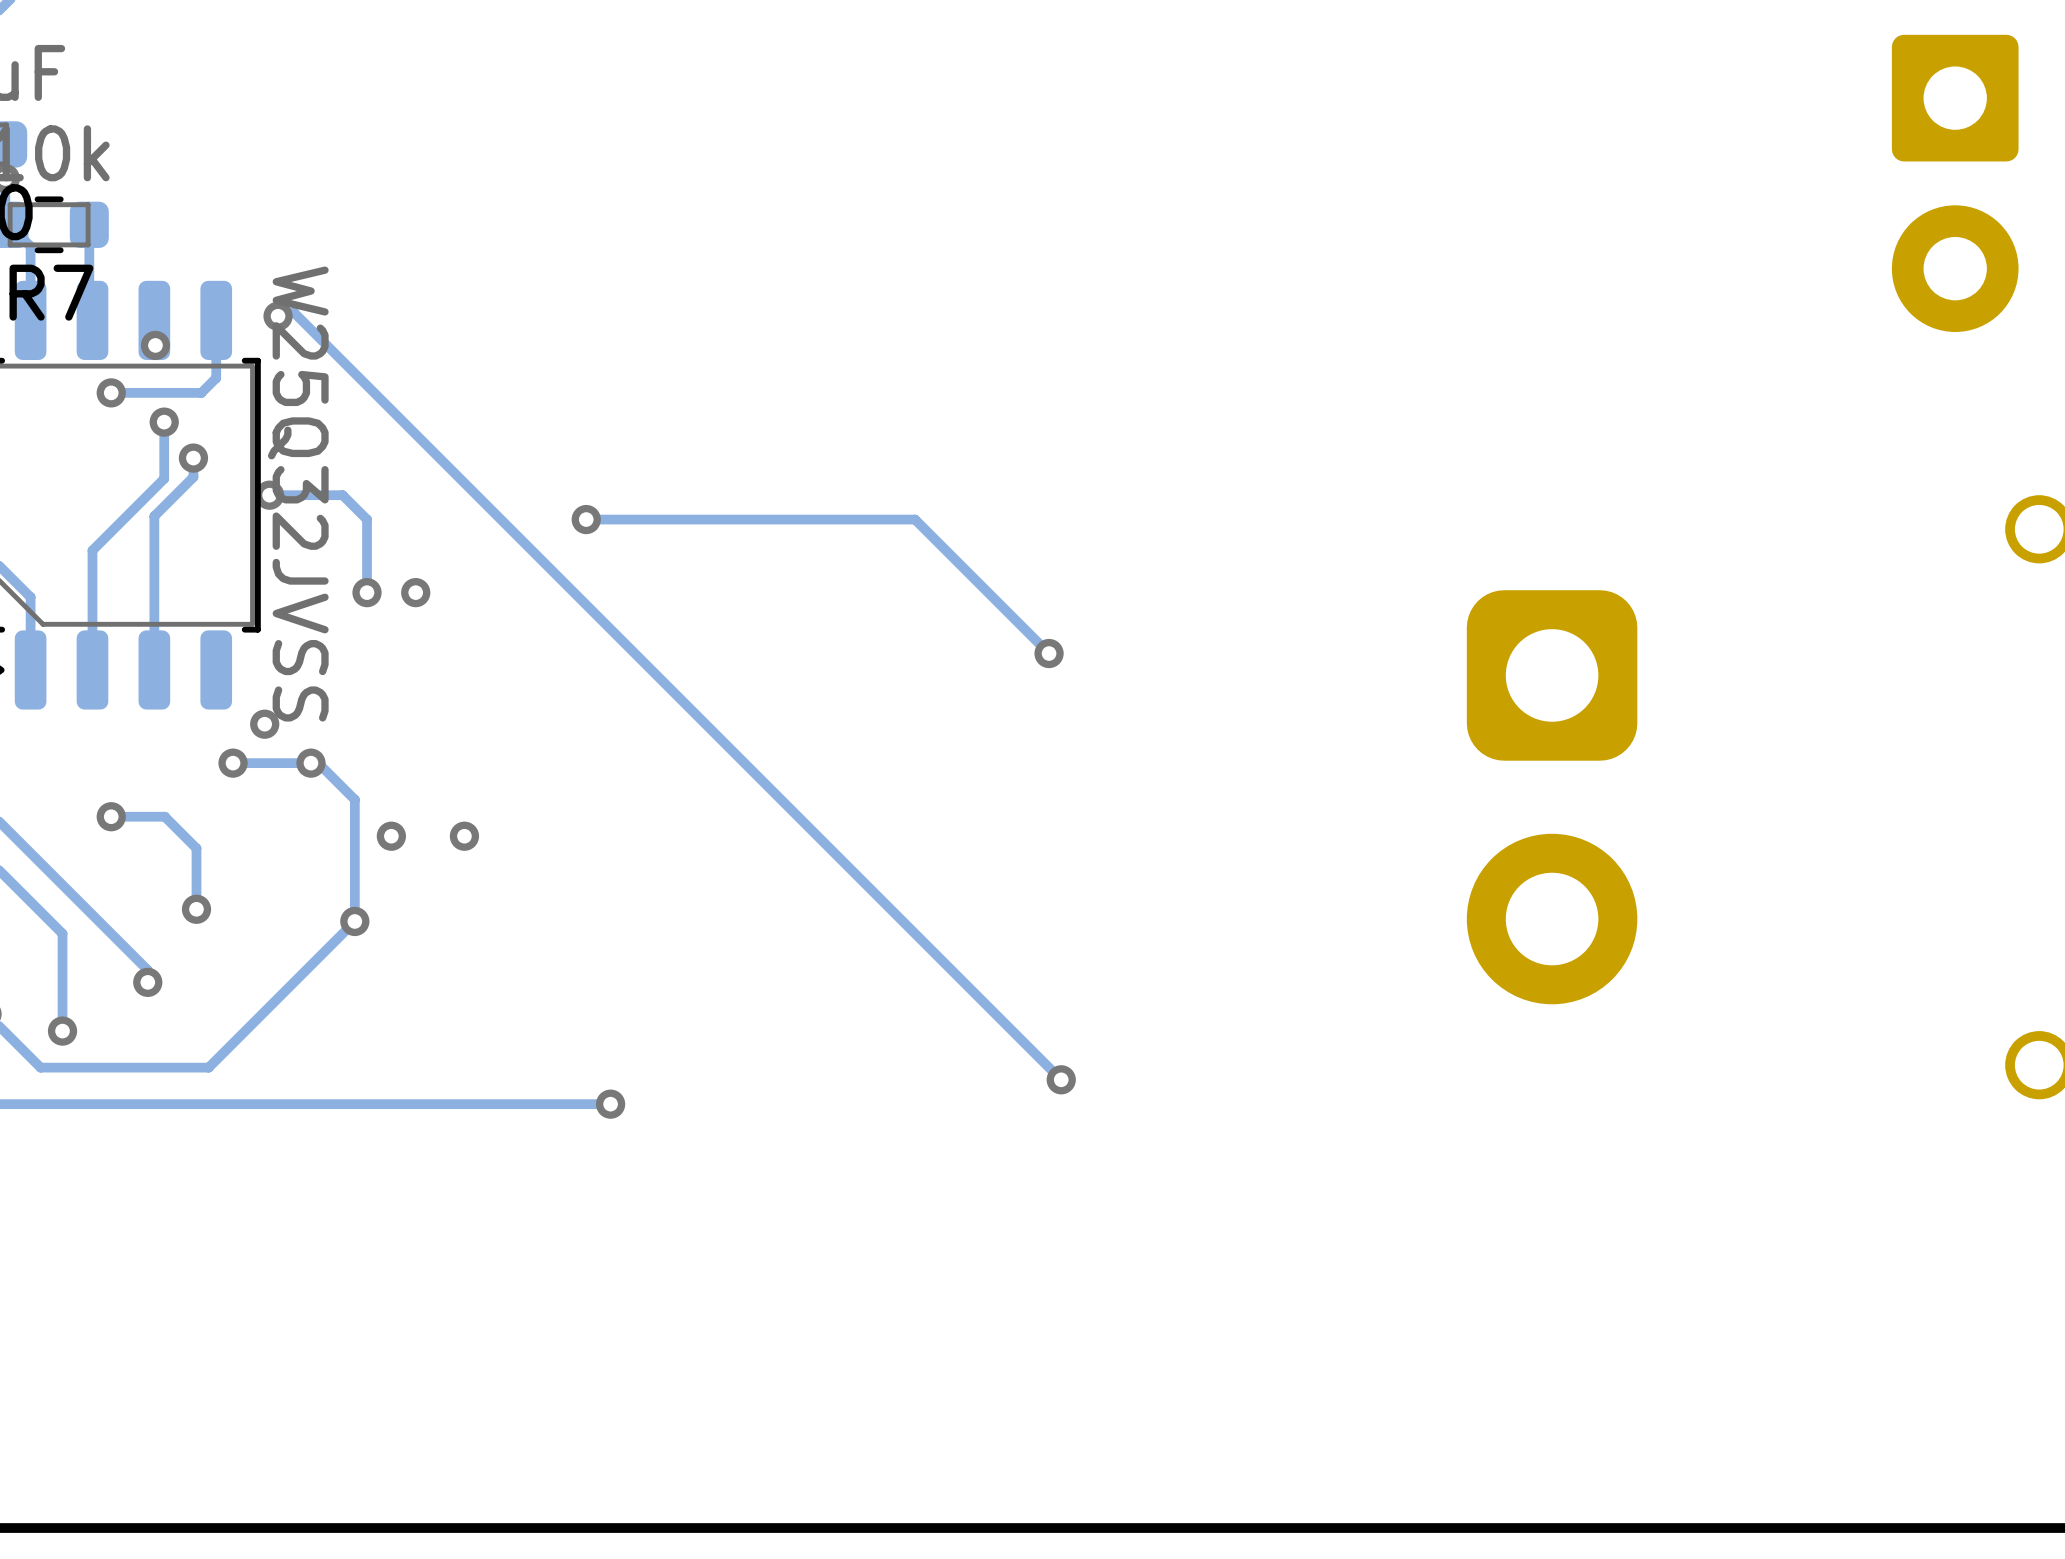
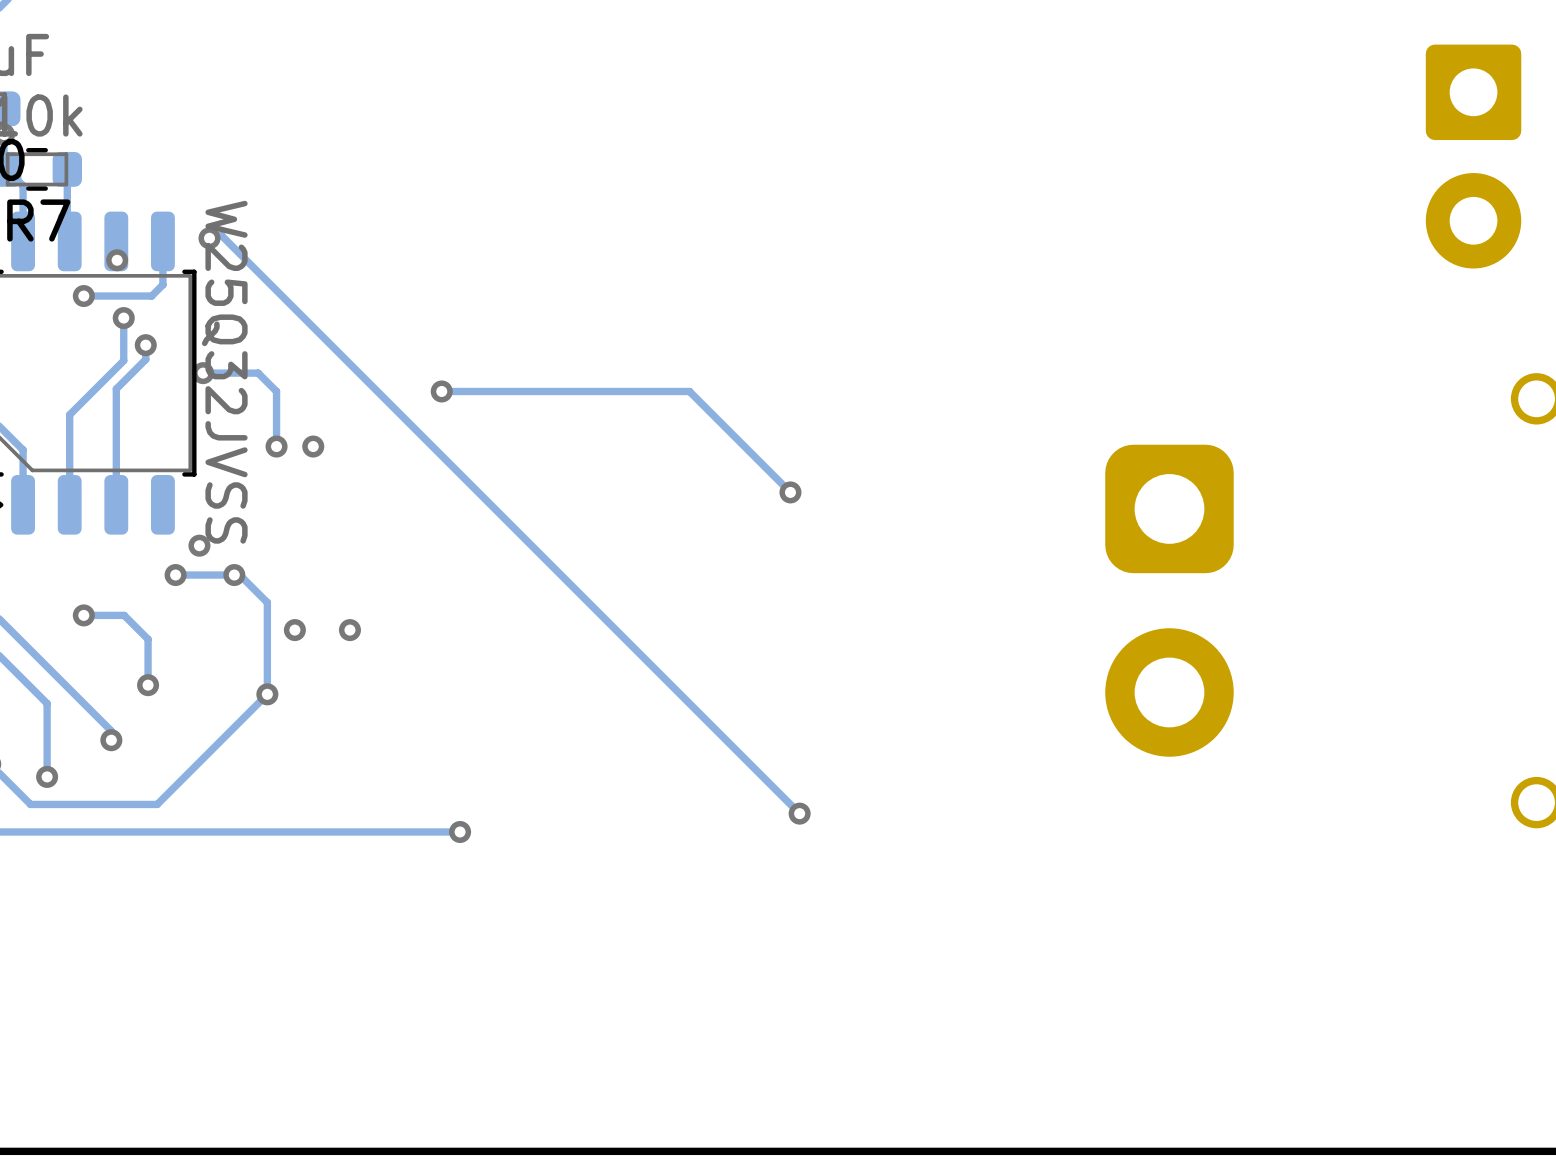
part position: (1955, 183) -> (1473, 156)

